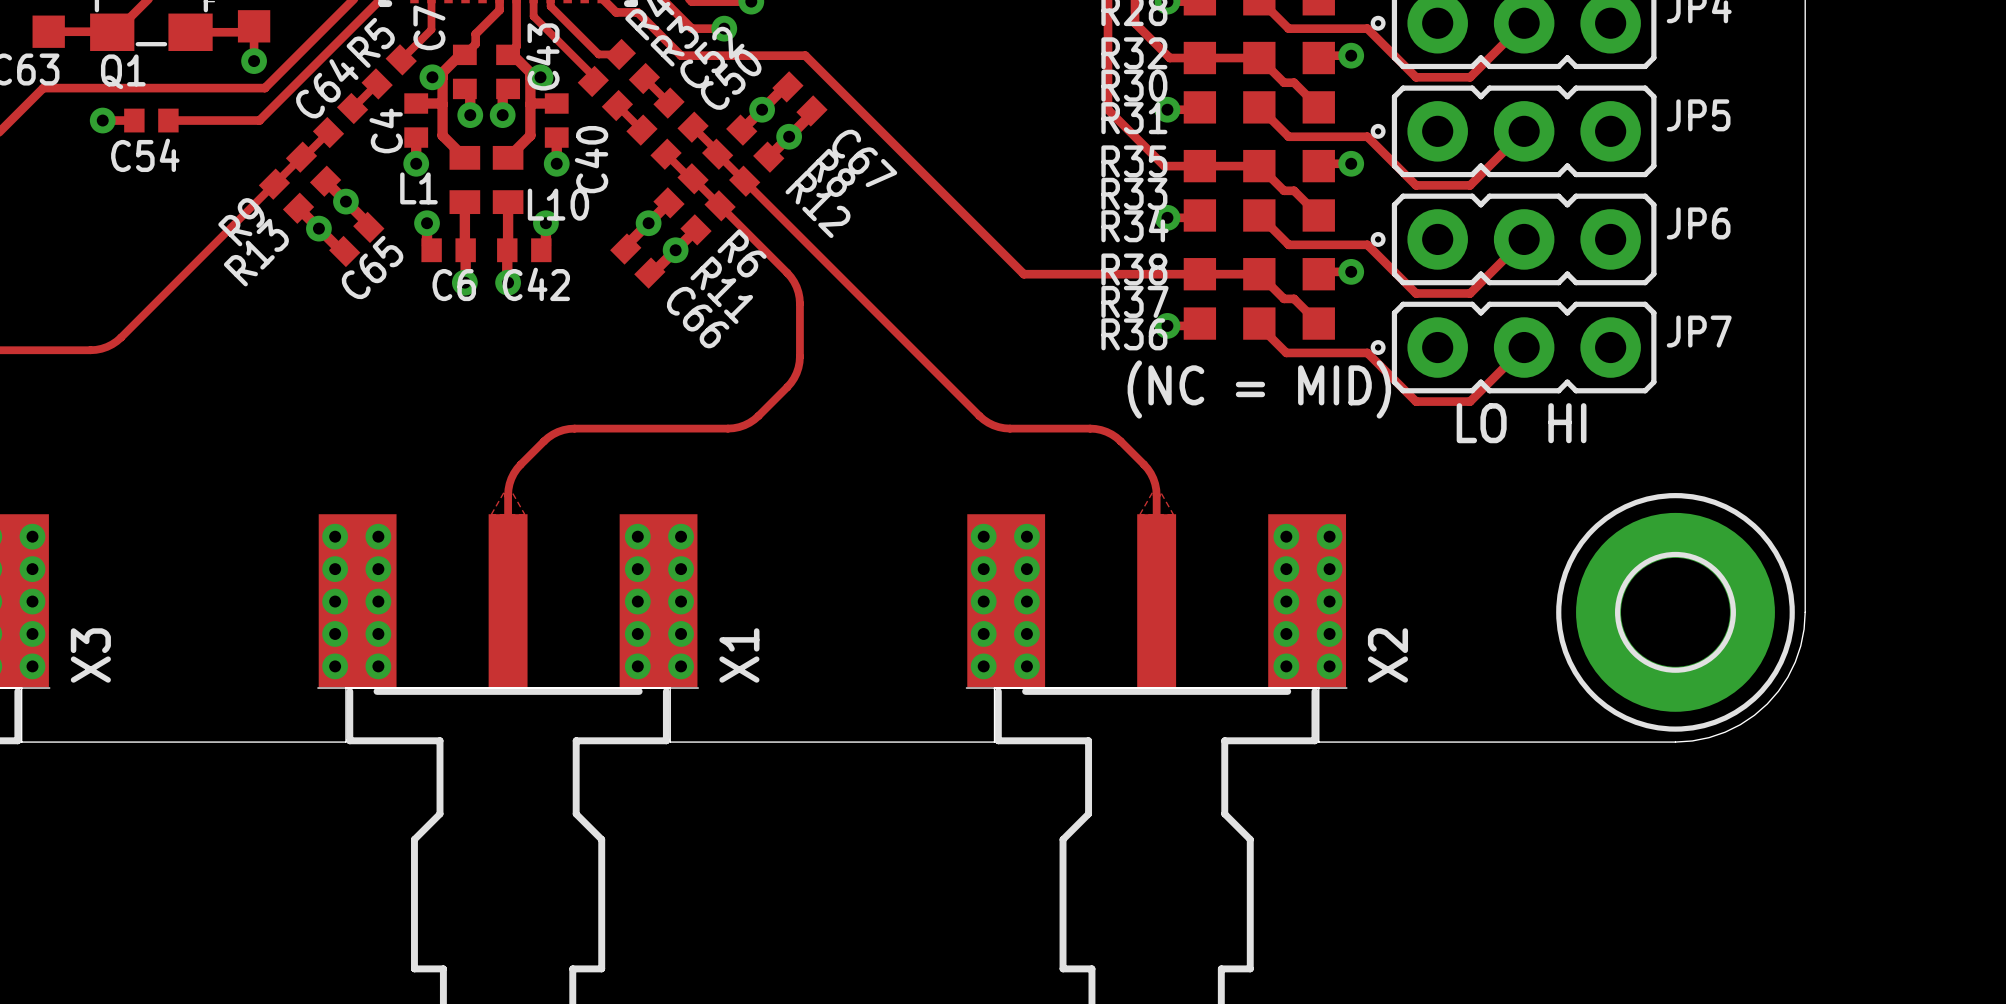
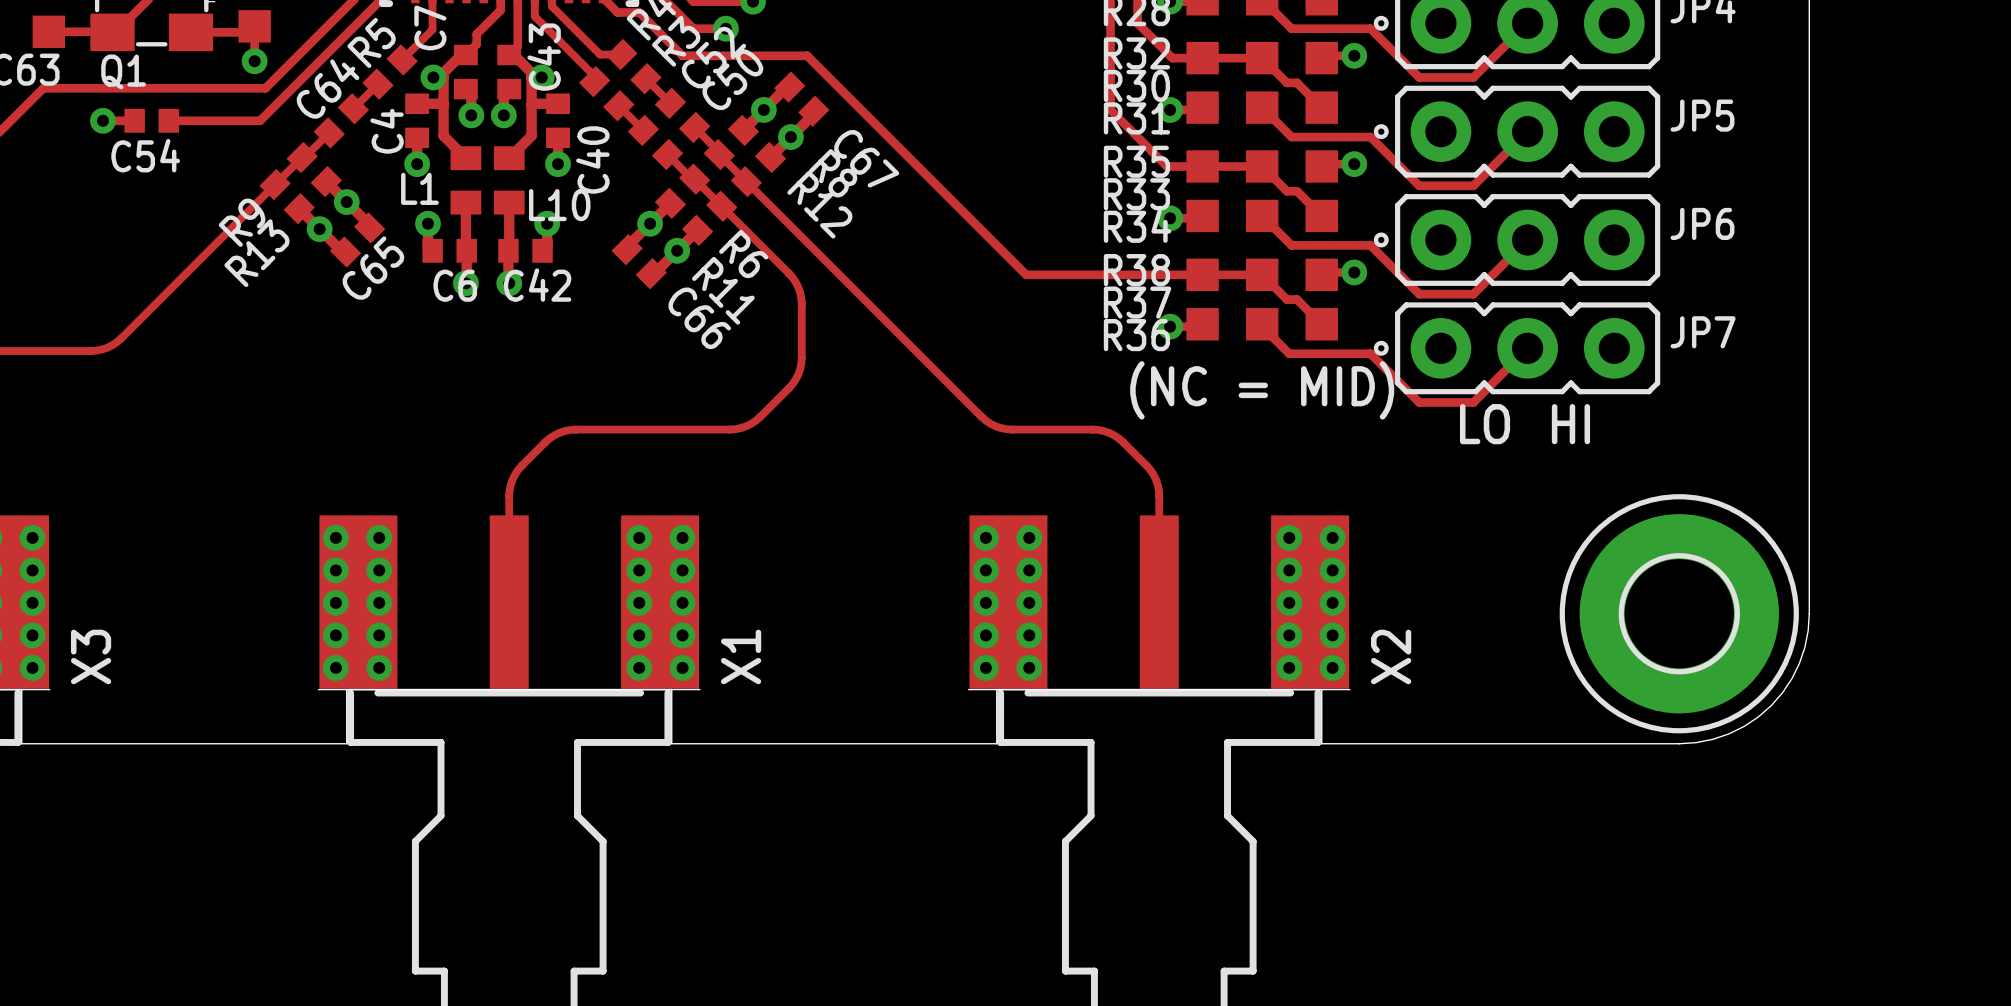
zone outline: (508, 485) (491, 514) (524, 514) (508, 485) -> none
zone outline: (1156, 485) (1139, 514) (1173, 514) (1156, 485) -> none

